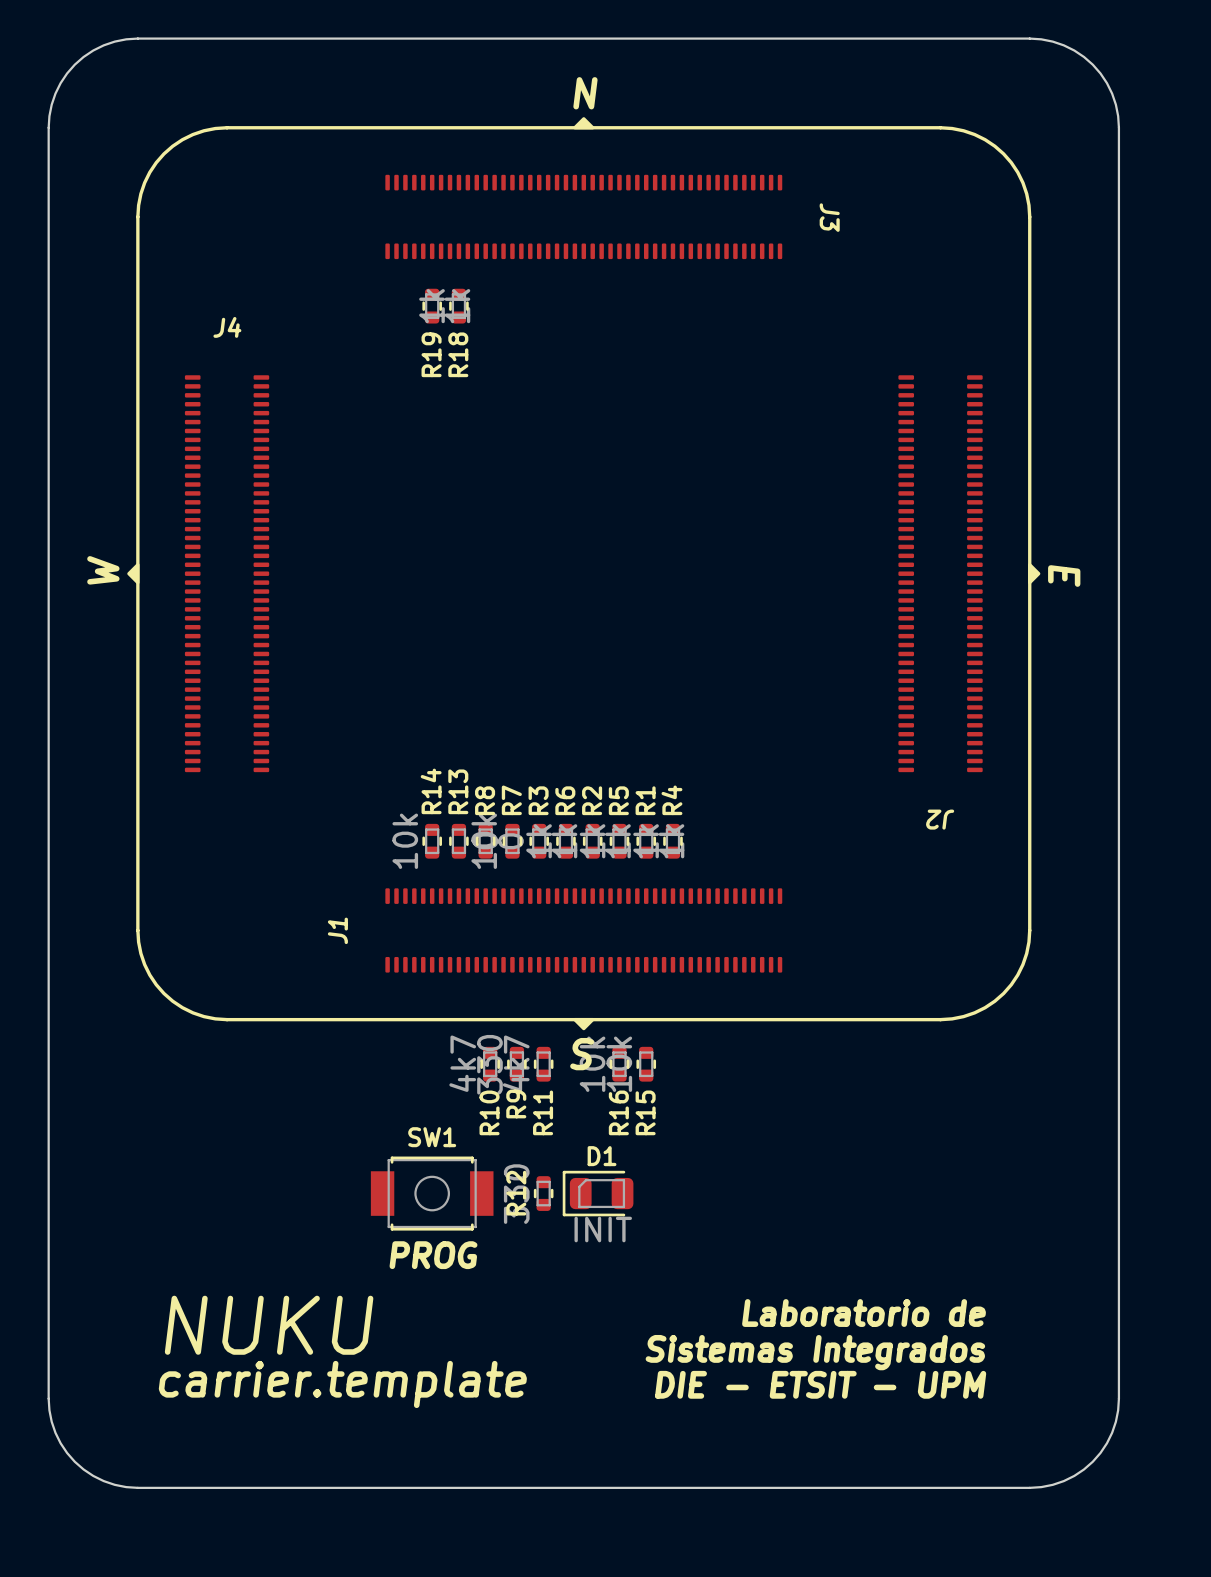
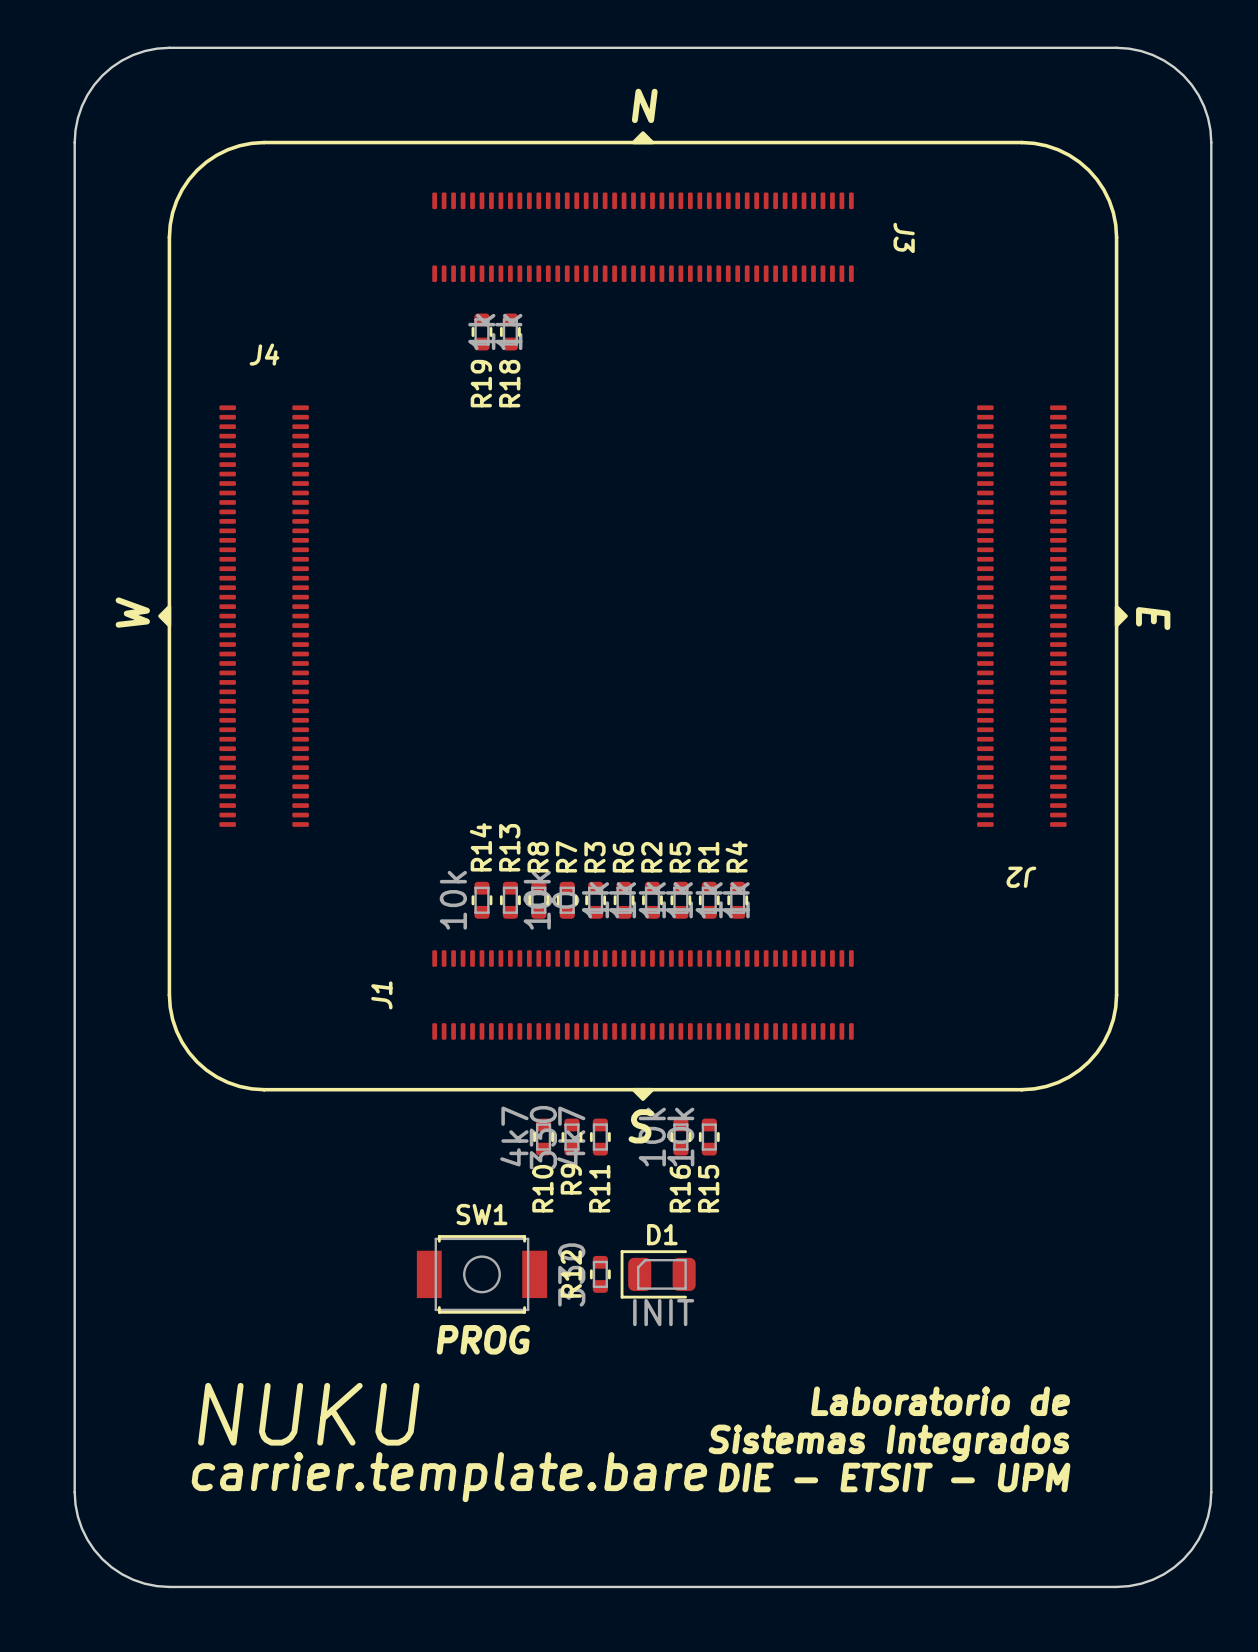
text: carrier.template (342, 1384) -> carrier.template.bare (449, 1477)

